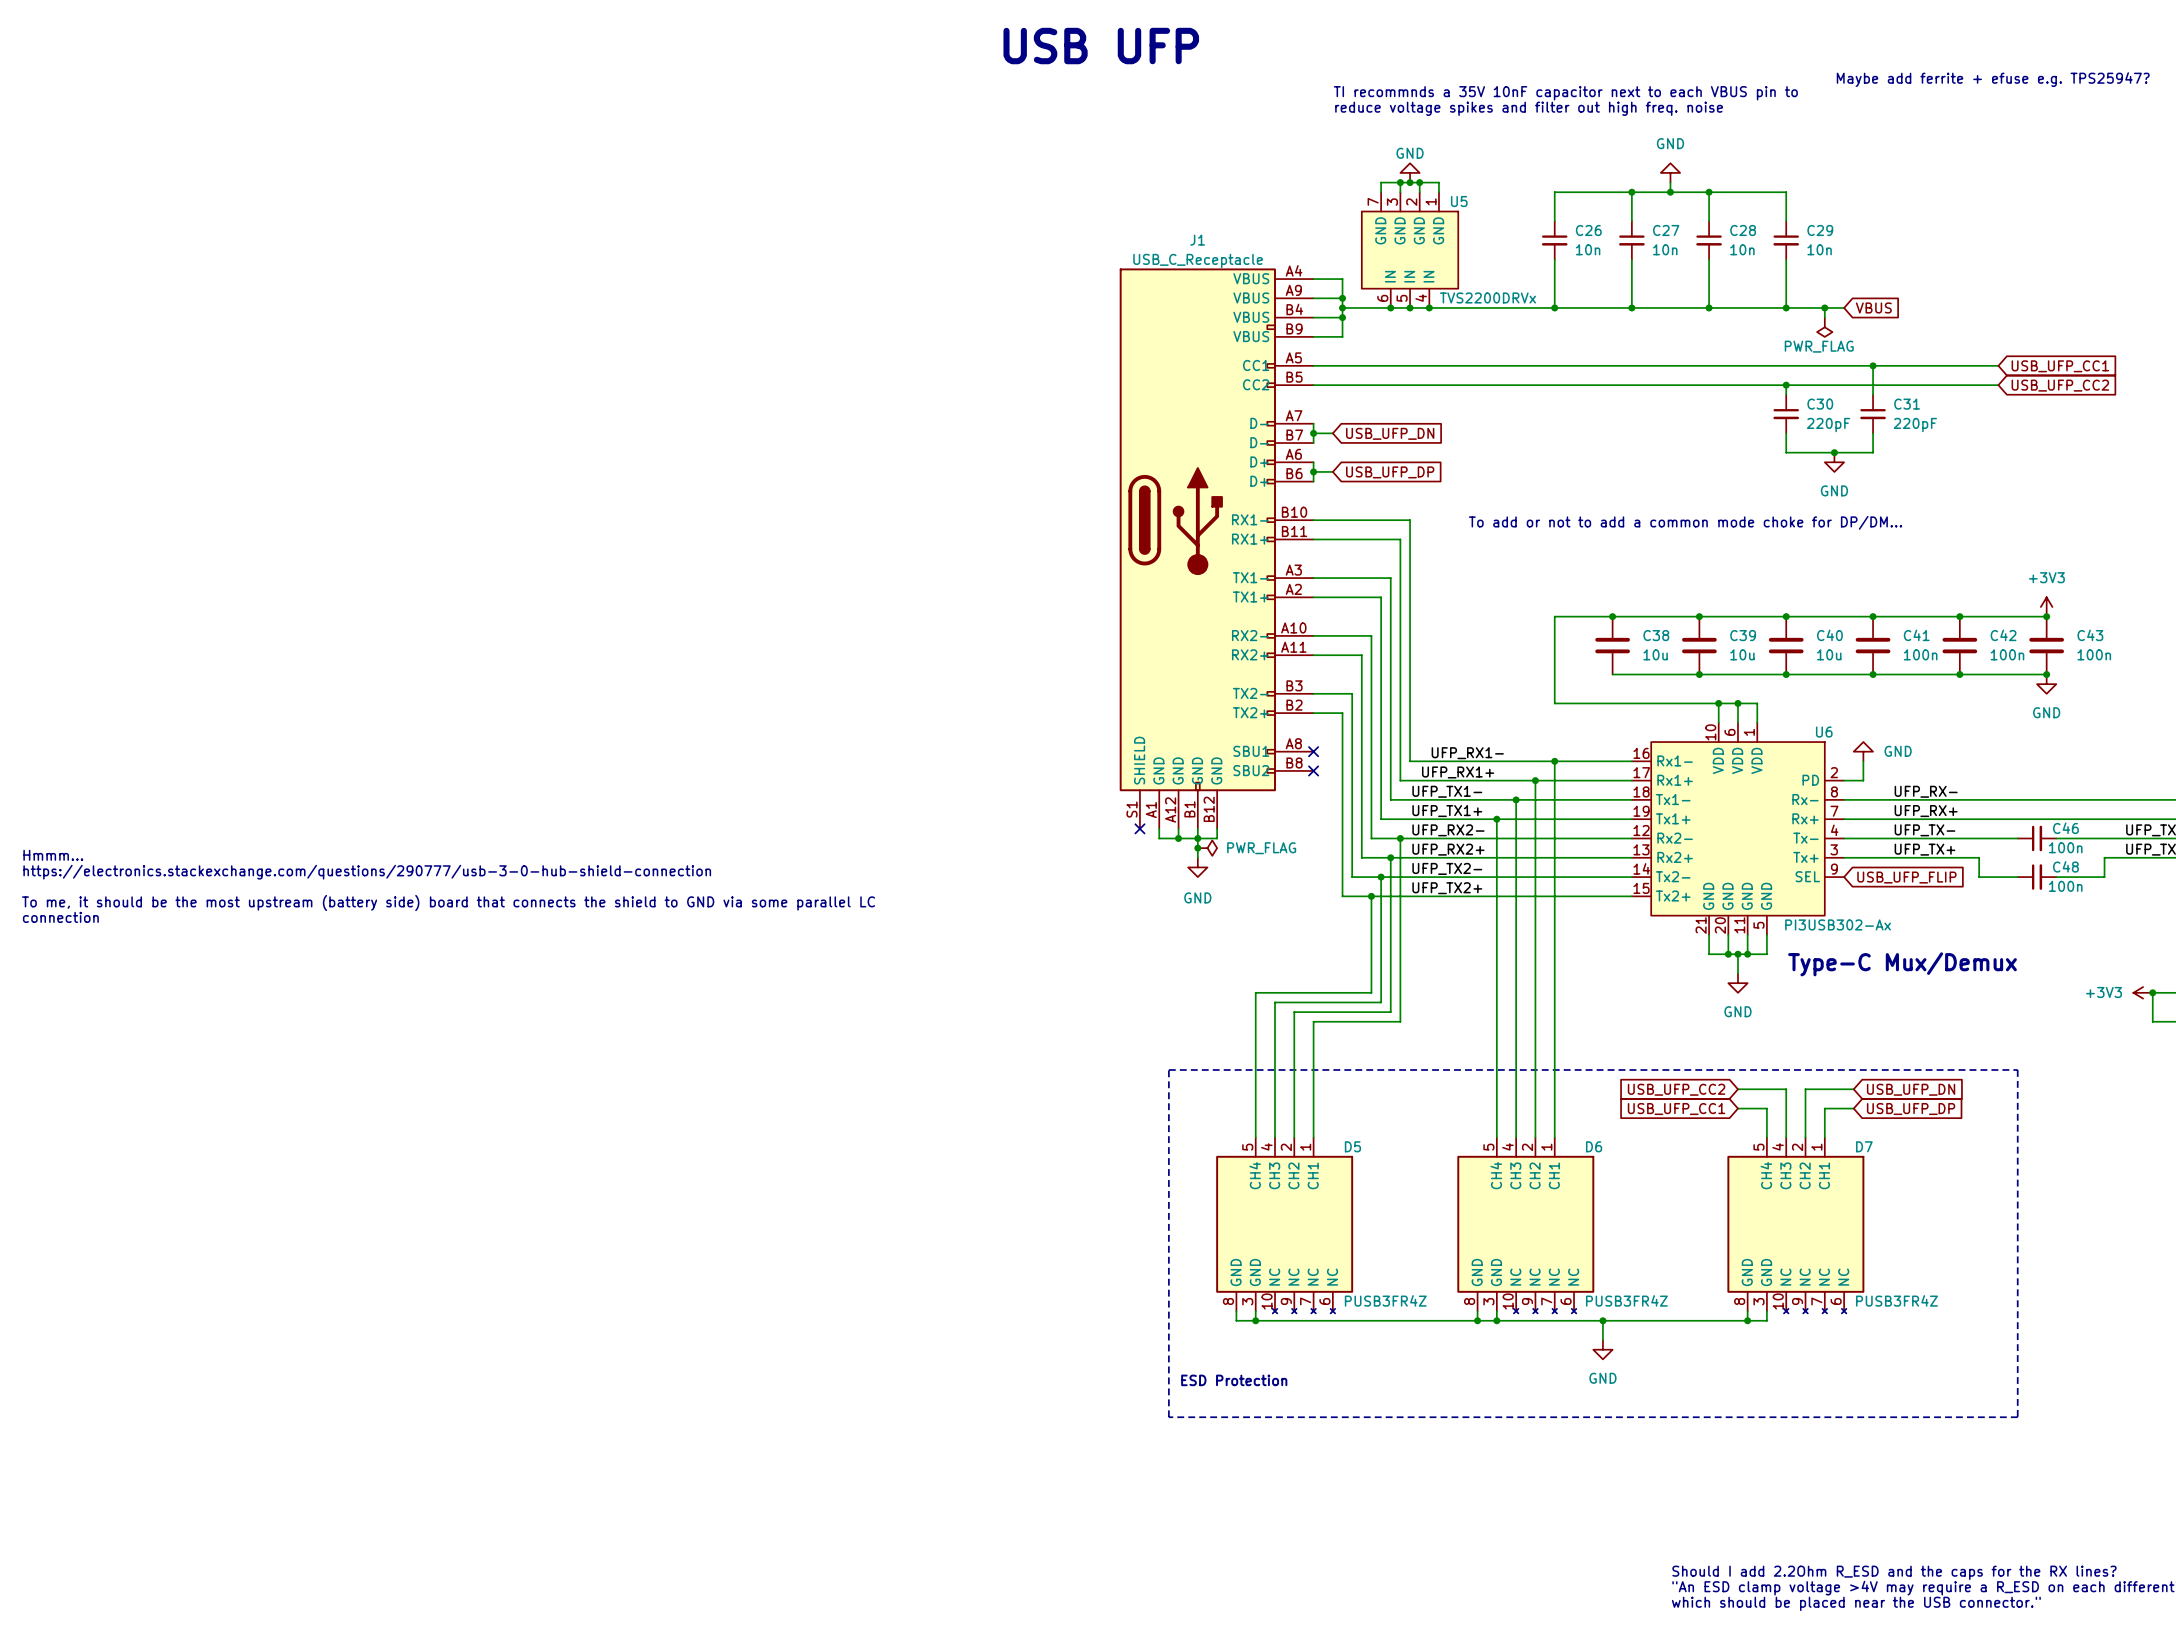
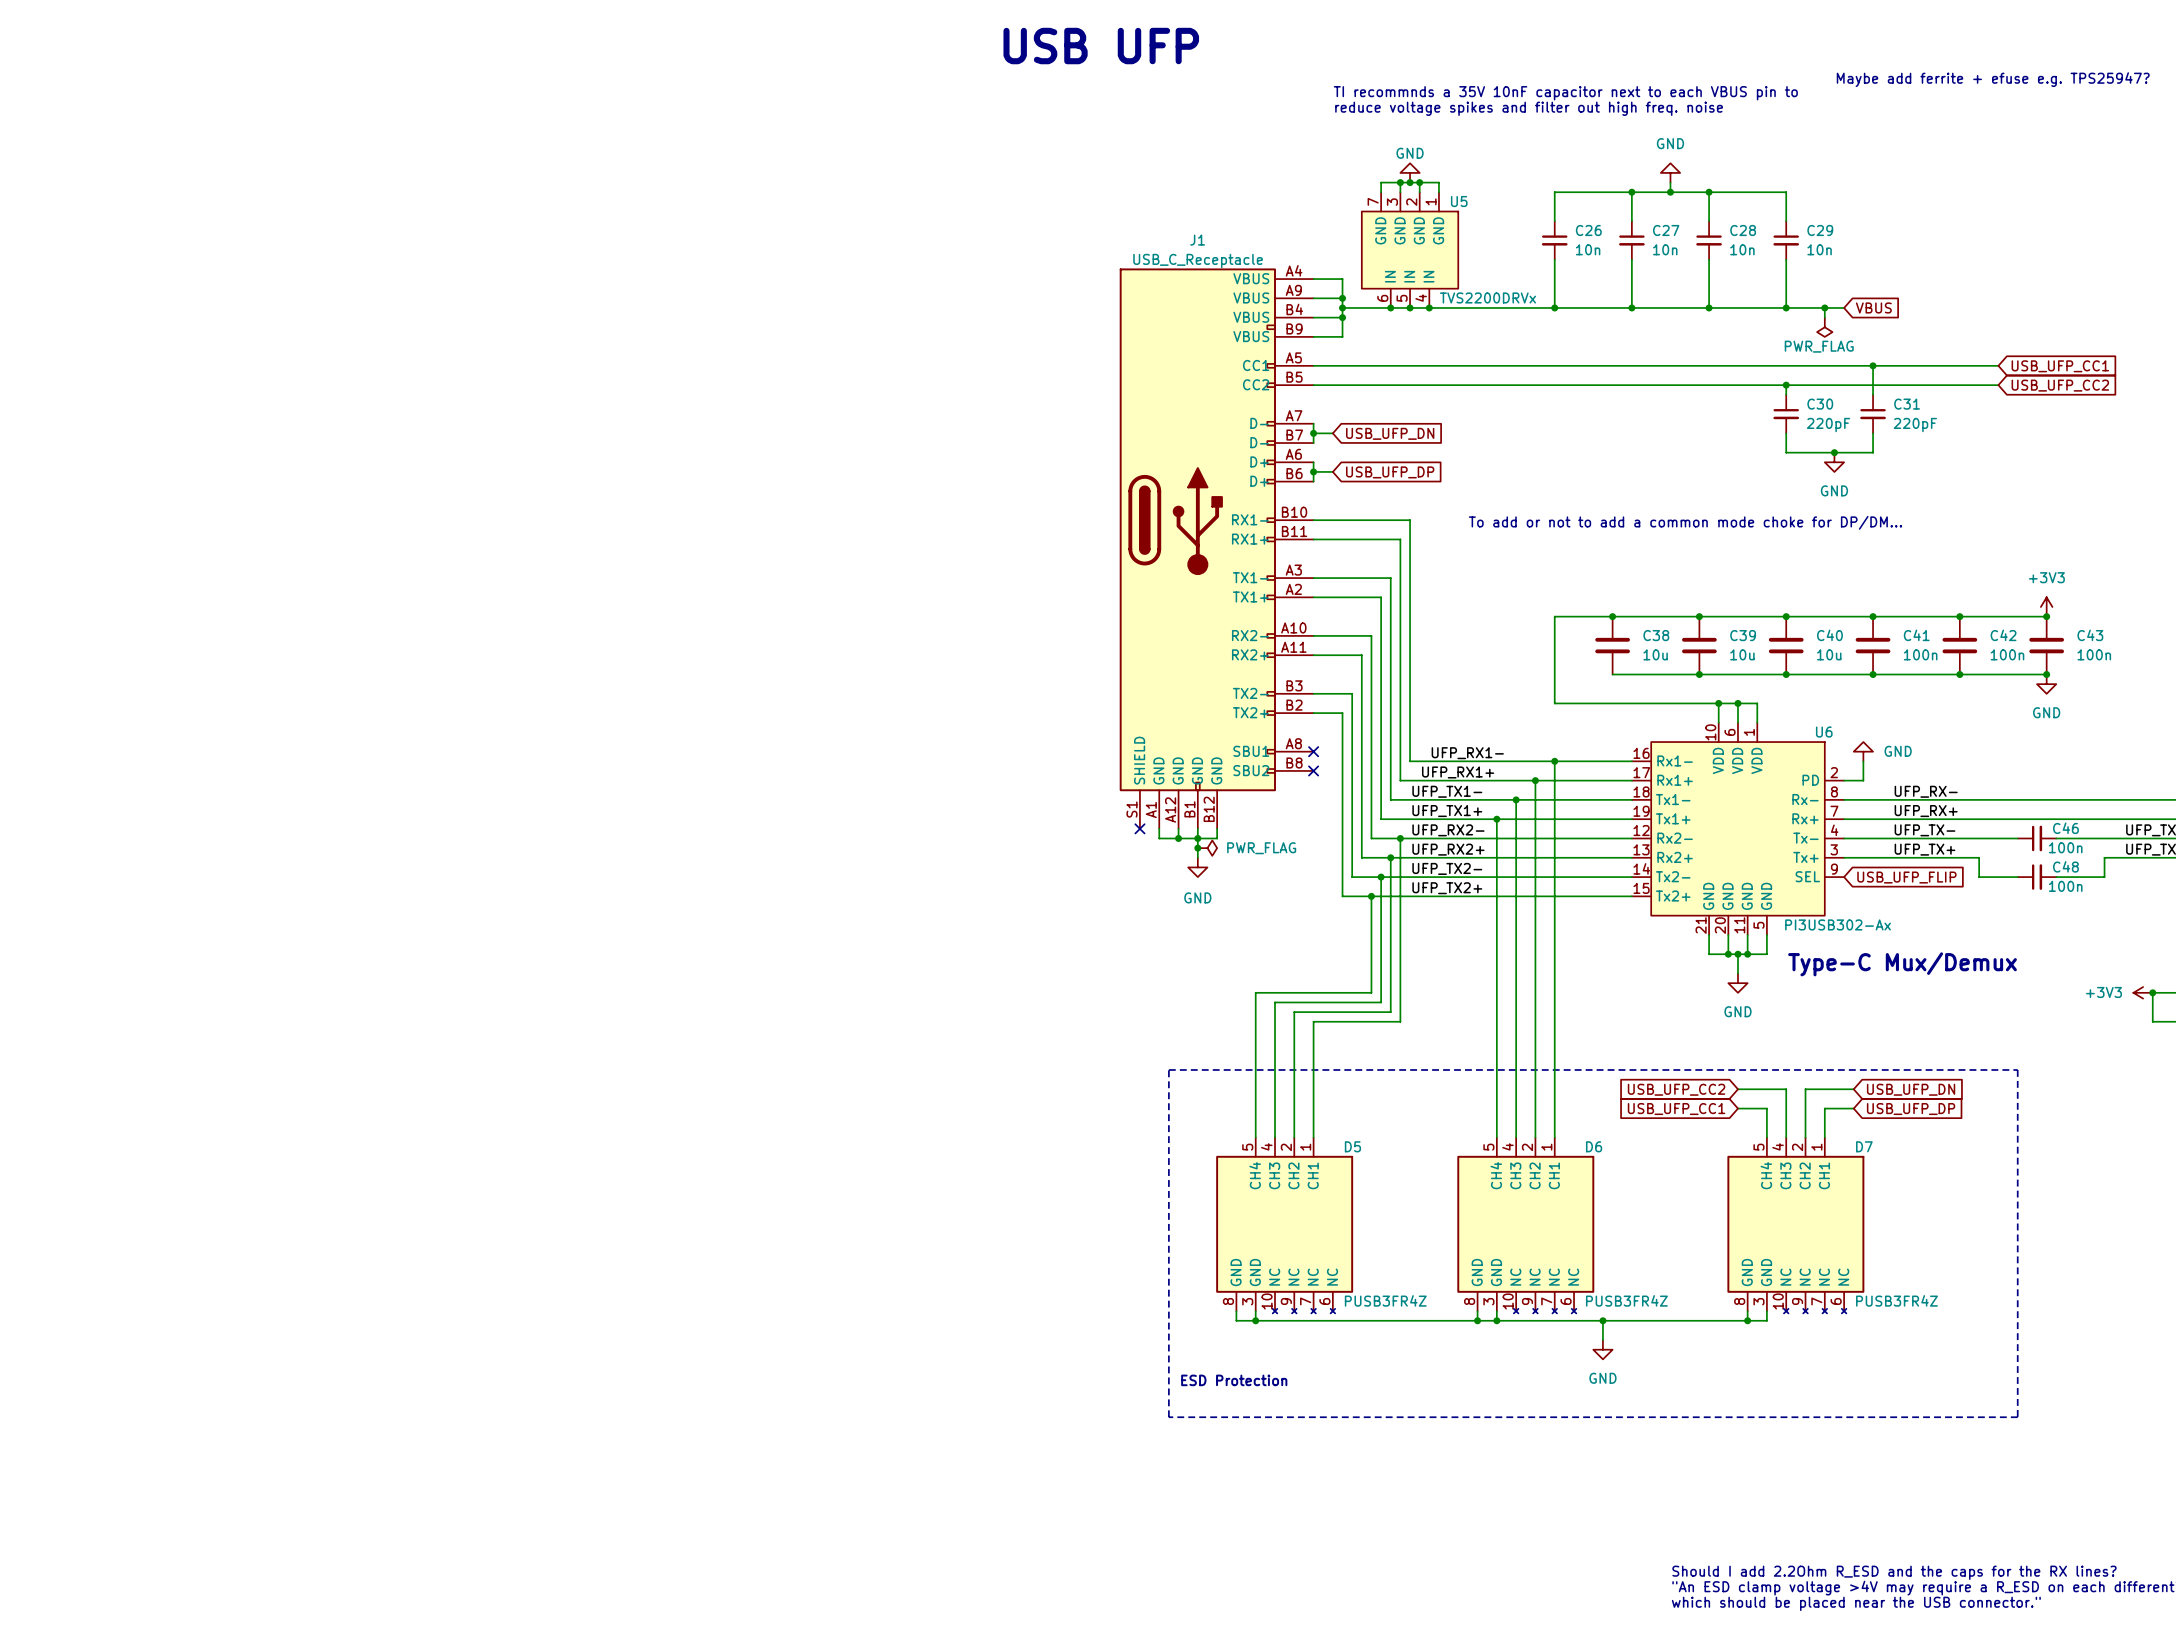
text: Hmmm... (53, 855) -> none
text: https://electronics.stackexchange.com/questions/290777/usb-3-0-hub-shield-connection (367, 872) -> none
text: To me, it should be the most upstream (battery side) board that connects the shield to GND via some parallel LC (448, 903) -> none
text: connection (60, 917) -> none

